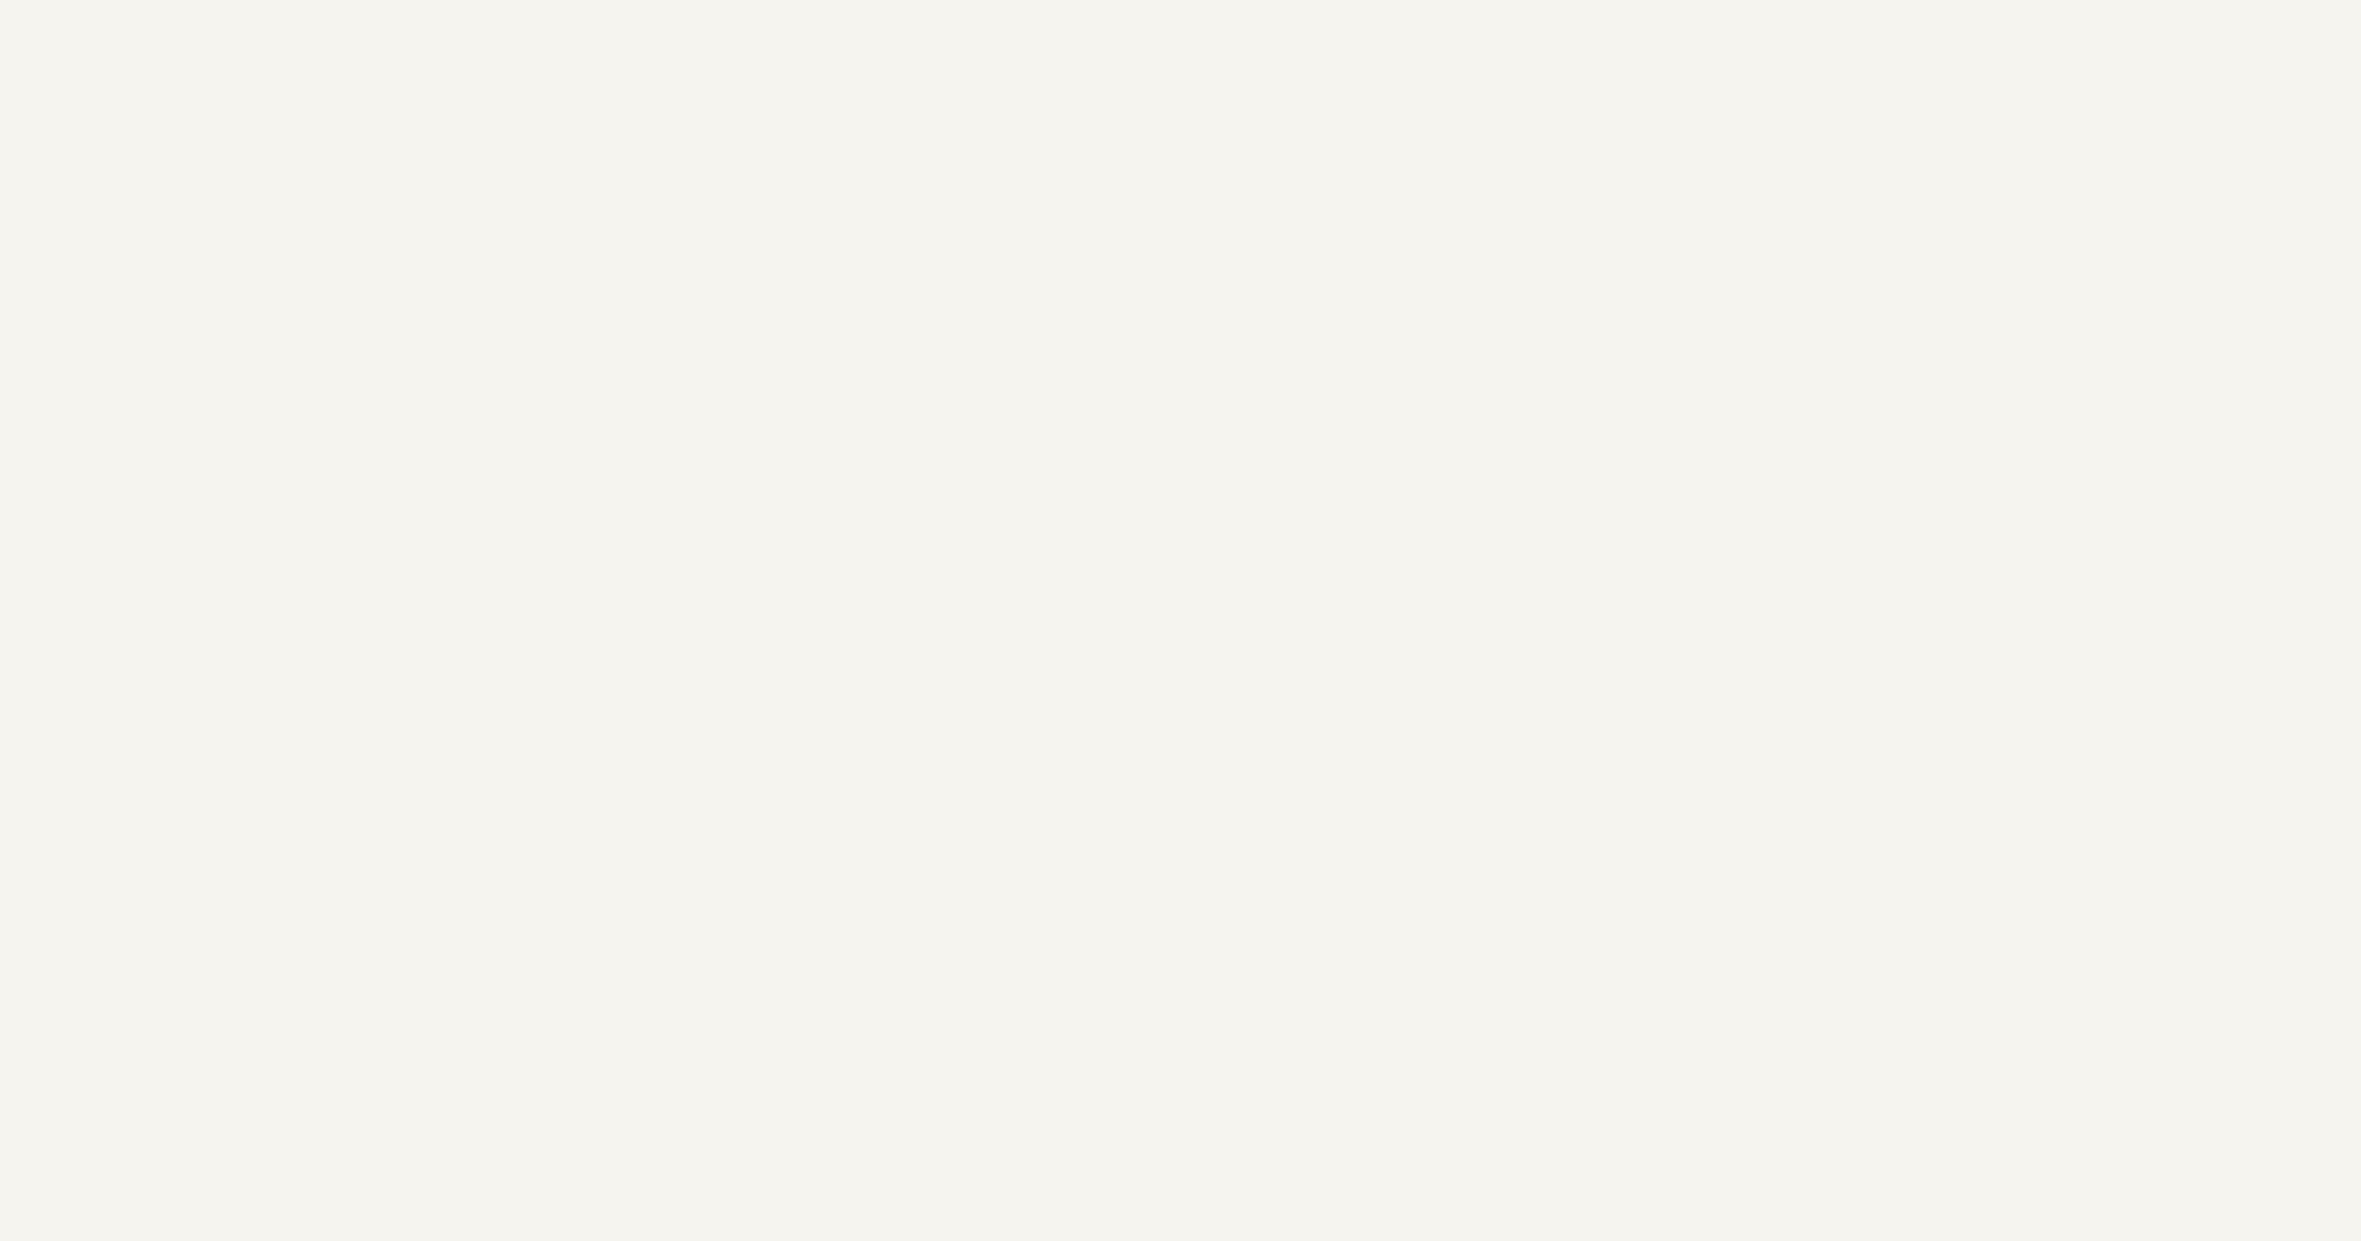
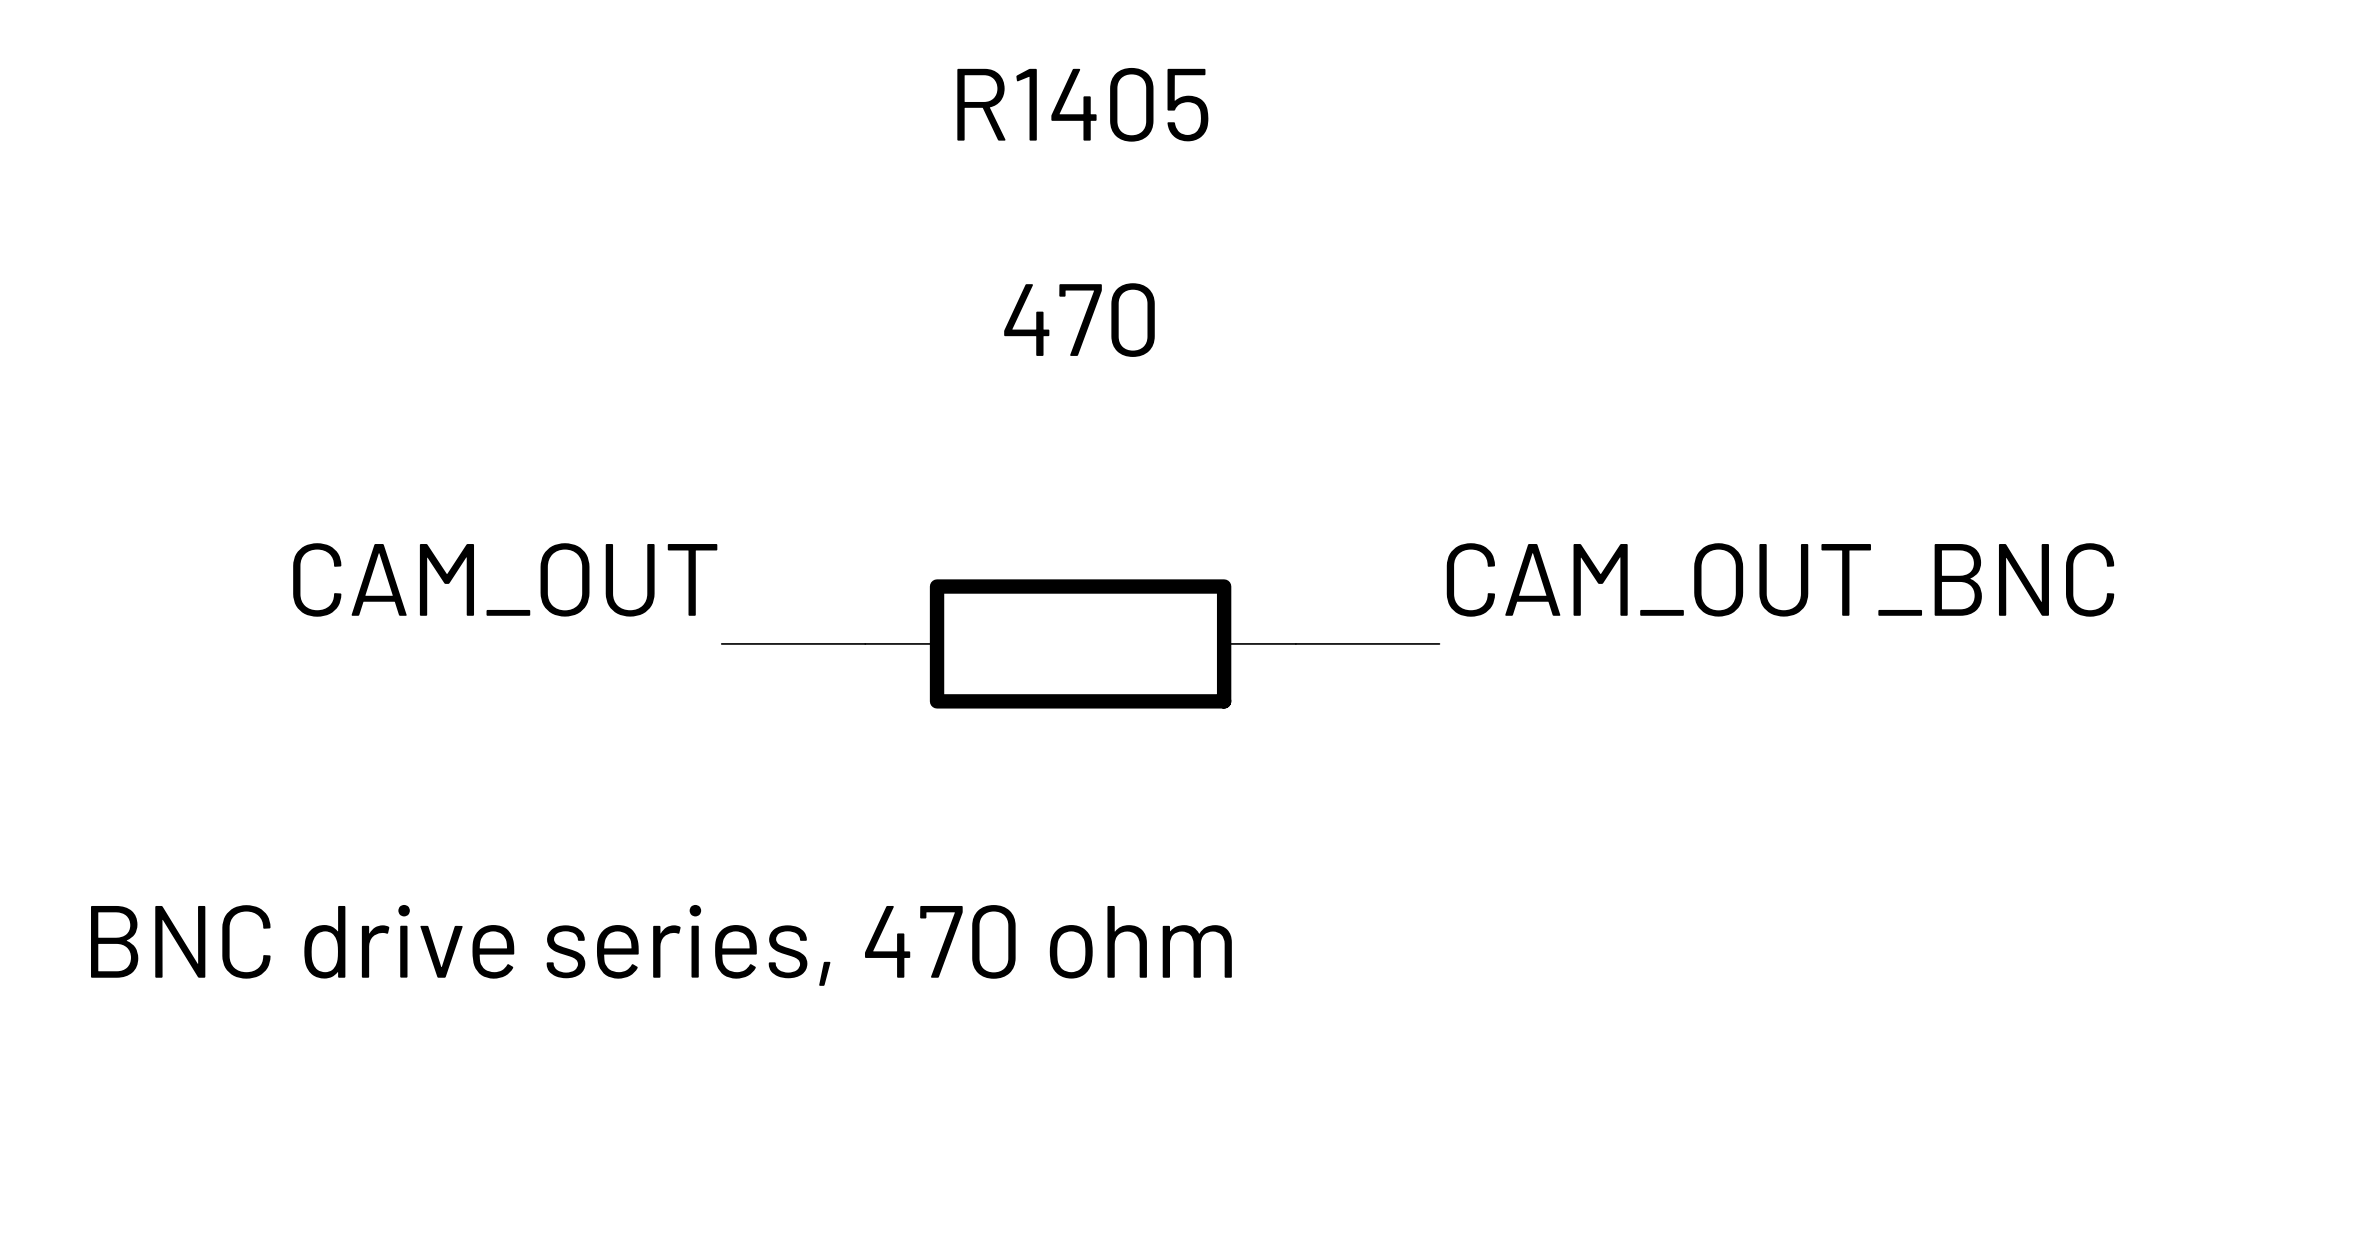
label: none -> CAM_OUT (505, 579)
label: none -> CAM_OUT_BNC (1780, 579)
wire: none -> (721, 643) (865, 643)
R1405: none -> 470 (1080, 643)
wire: none -> (1295, 643) (1439, 643)
text: none -> BNC drive series, 470 ohm (661, 945)

